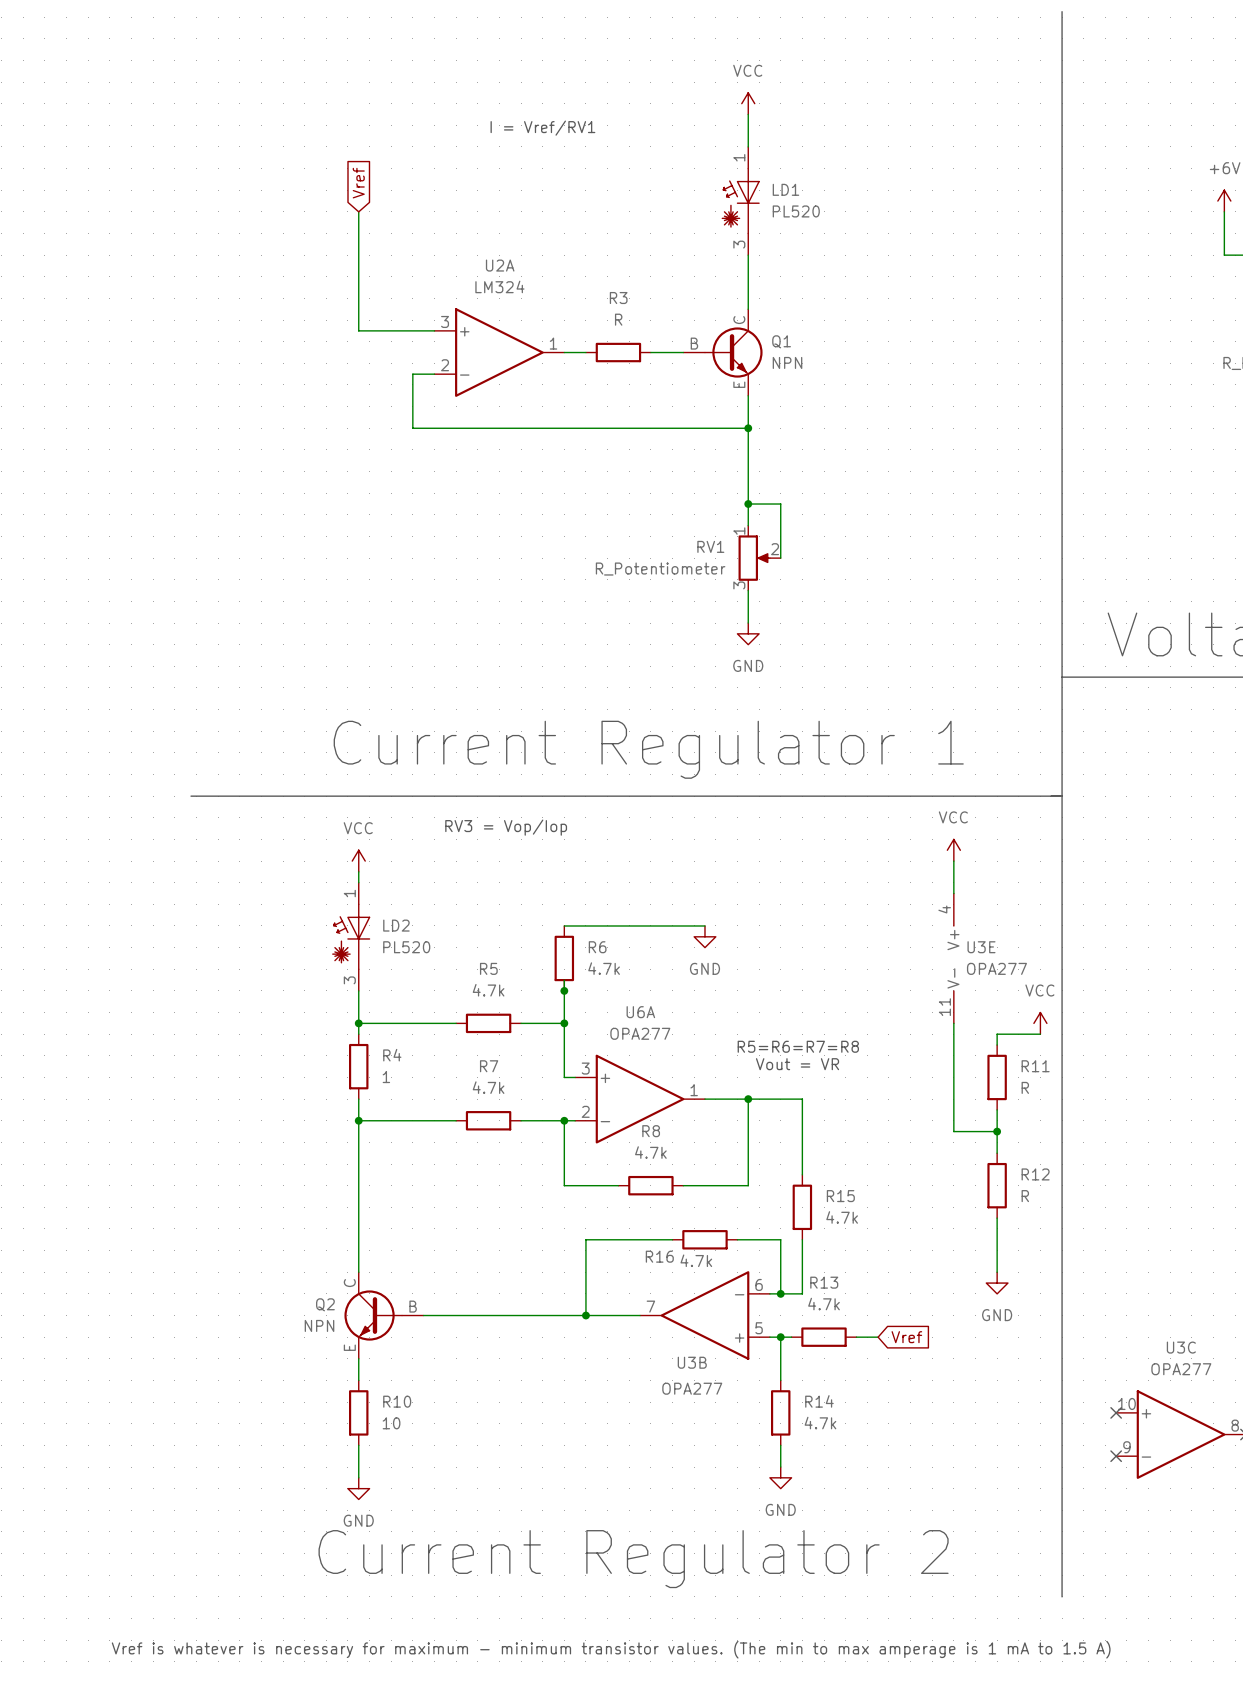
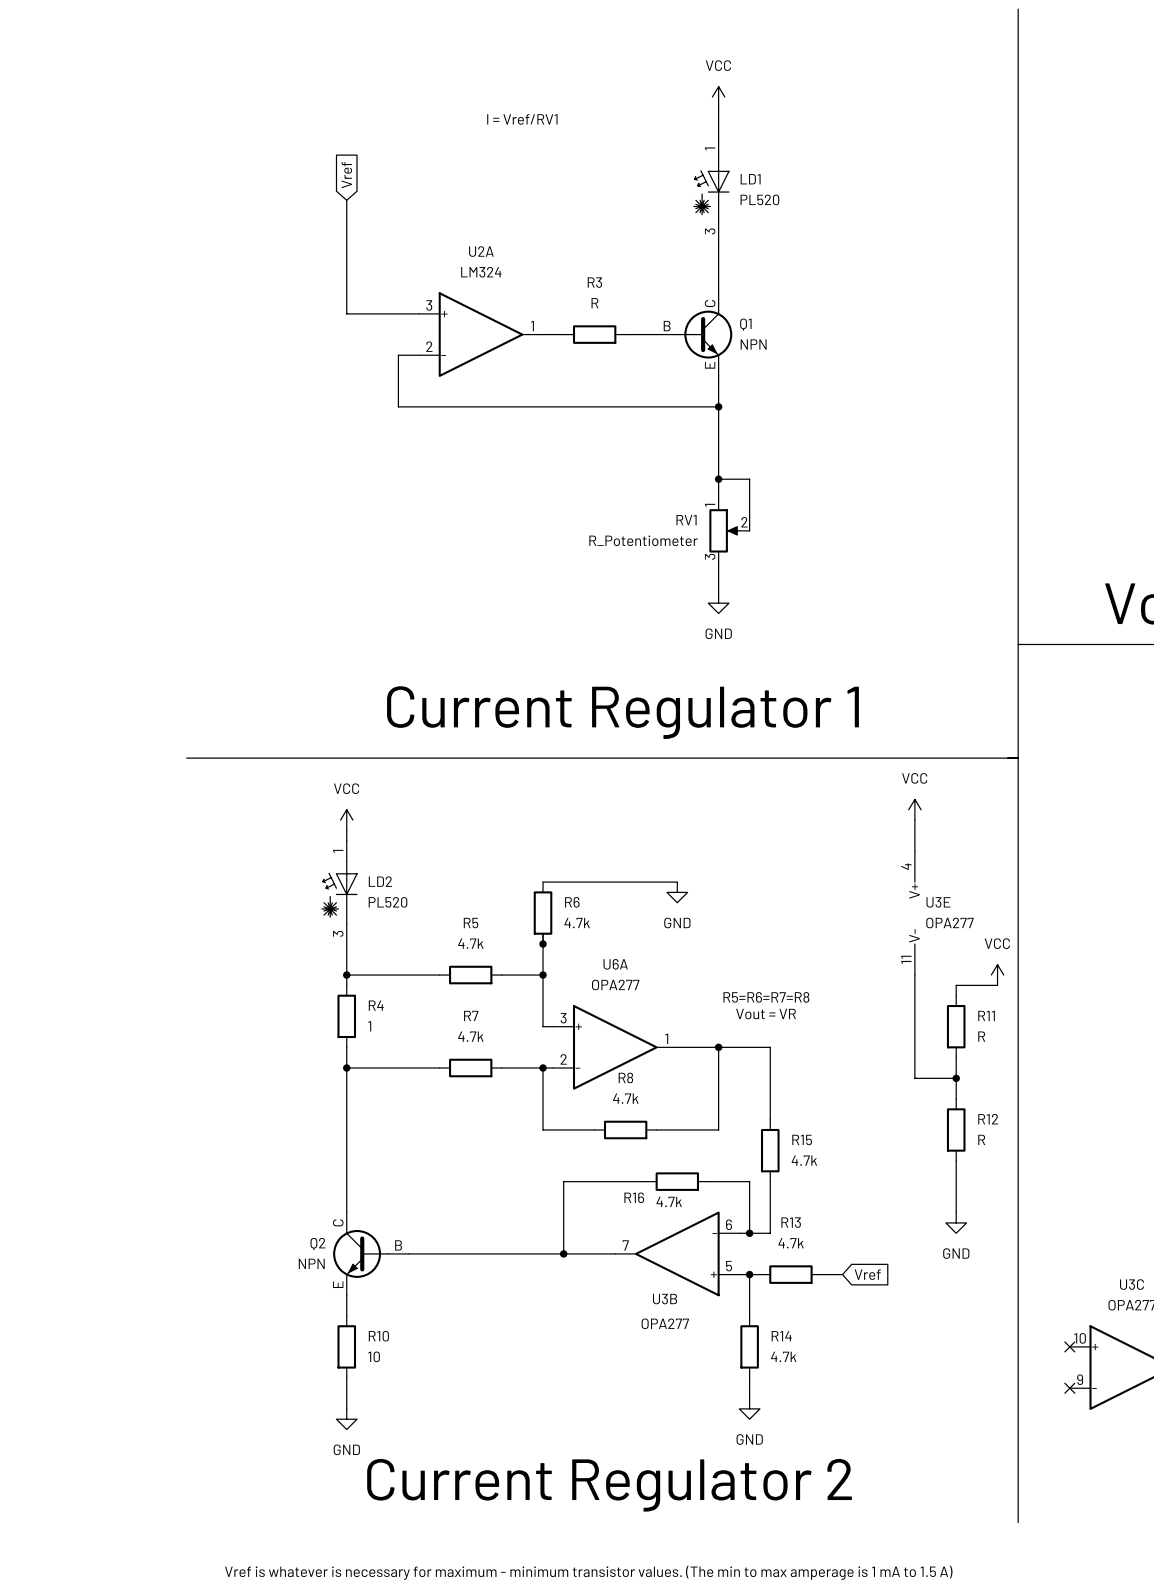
text: RV3 = Vop/Iop (506, 827) -> none

